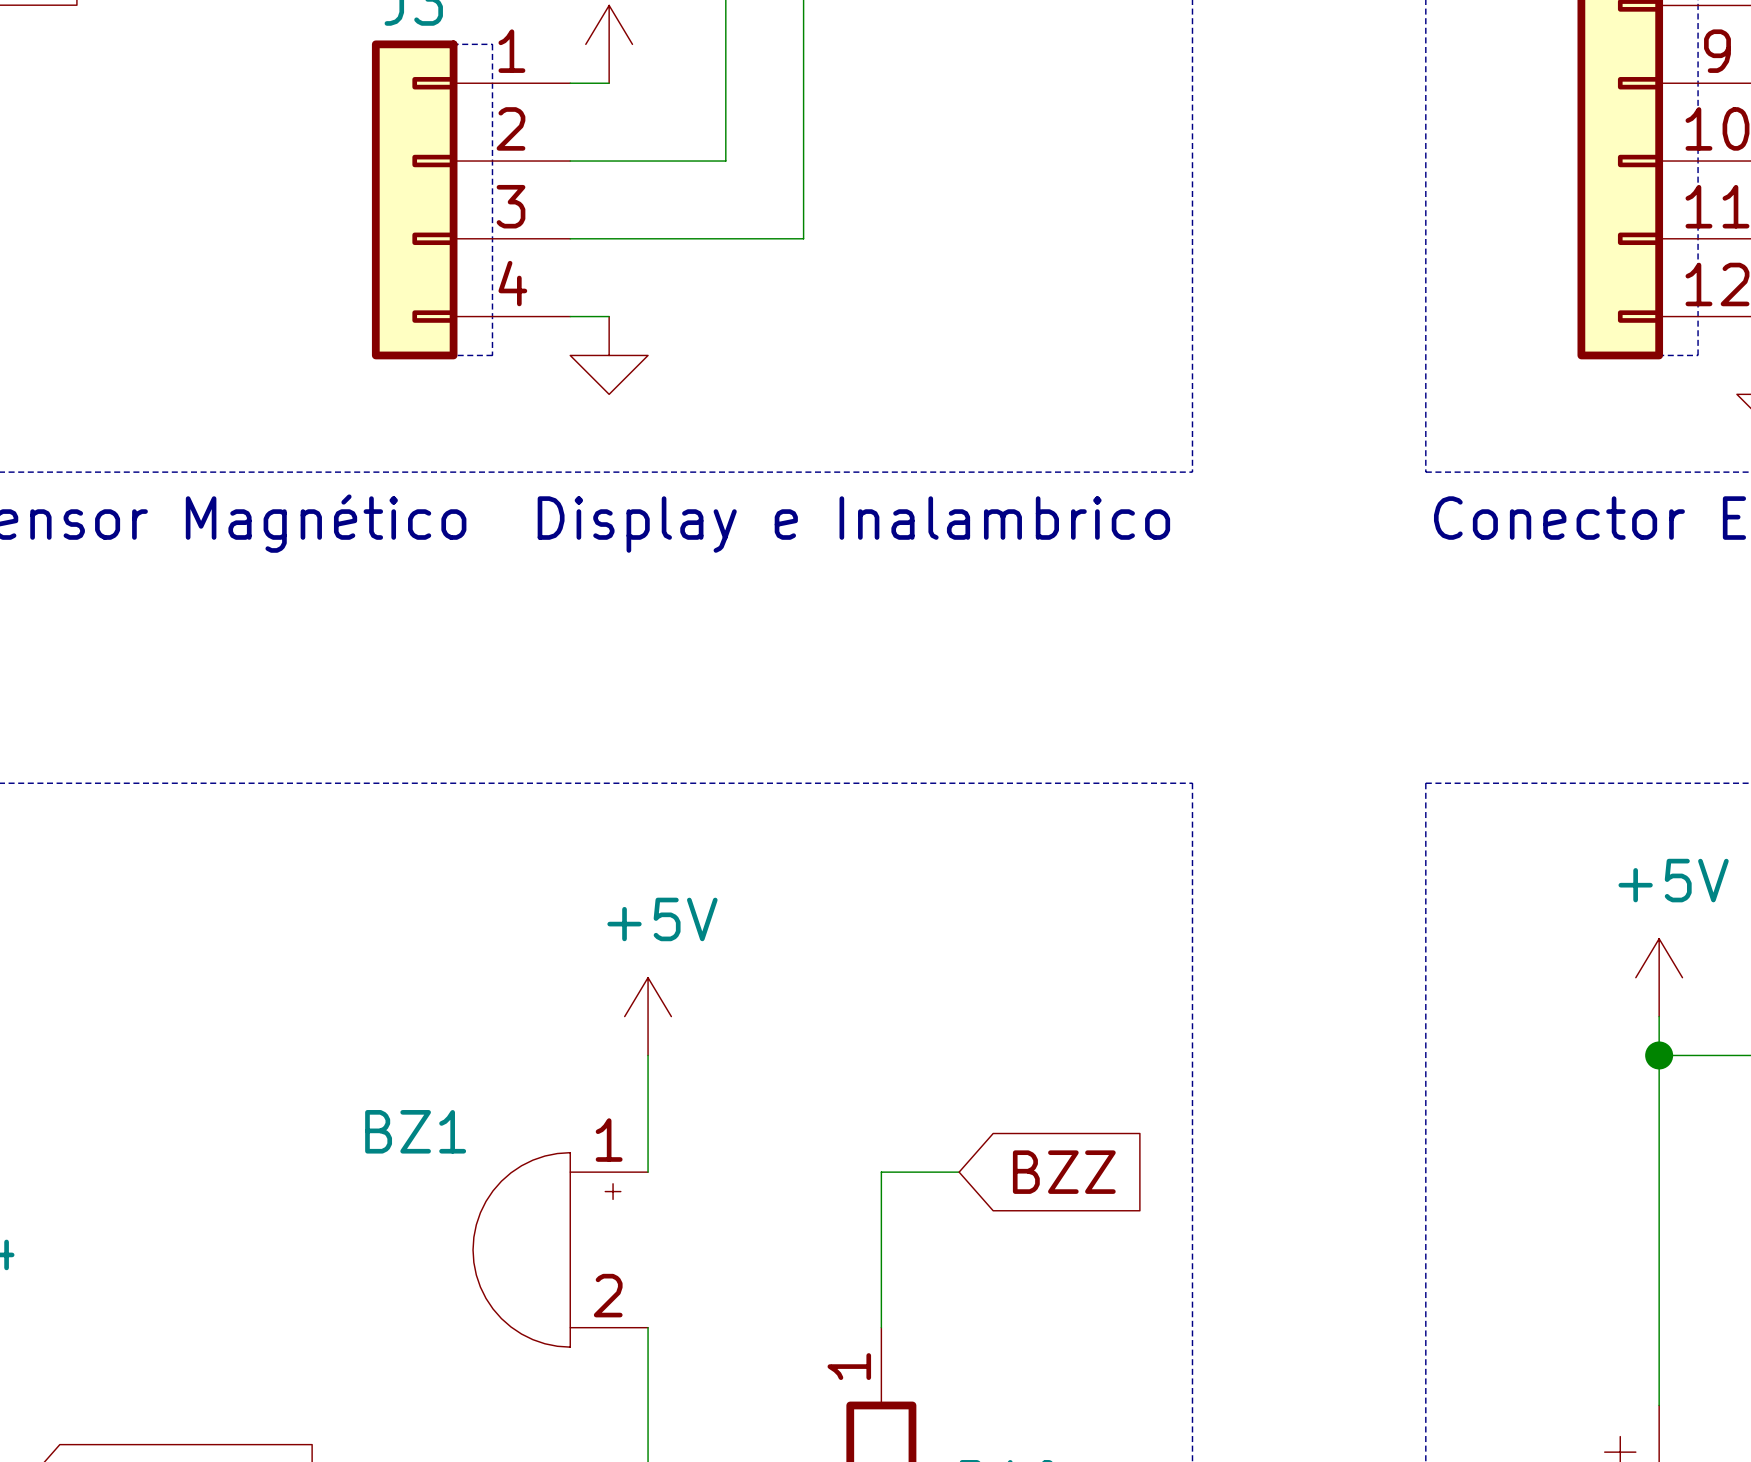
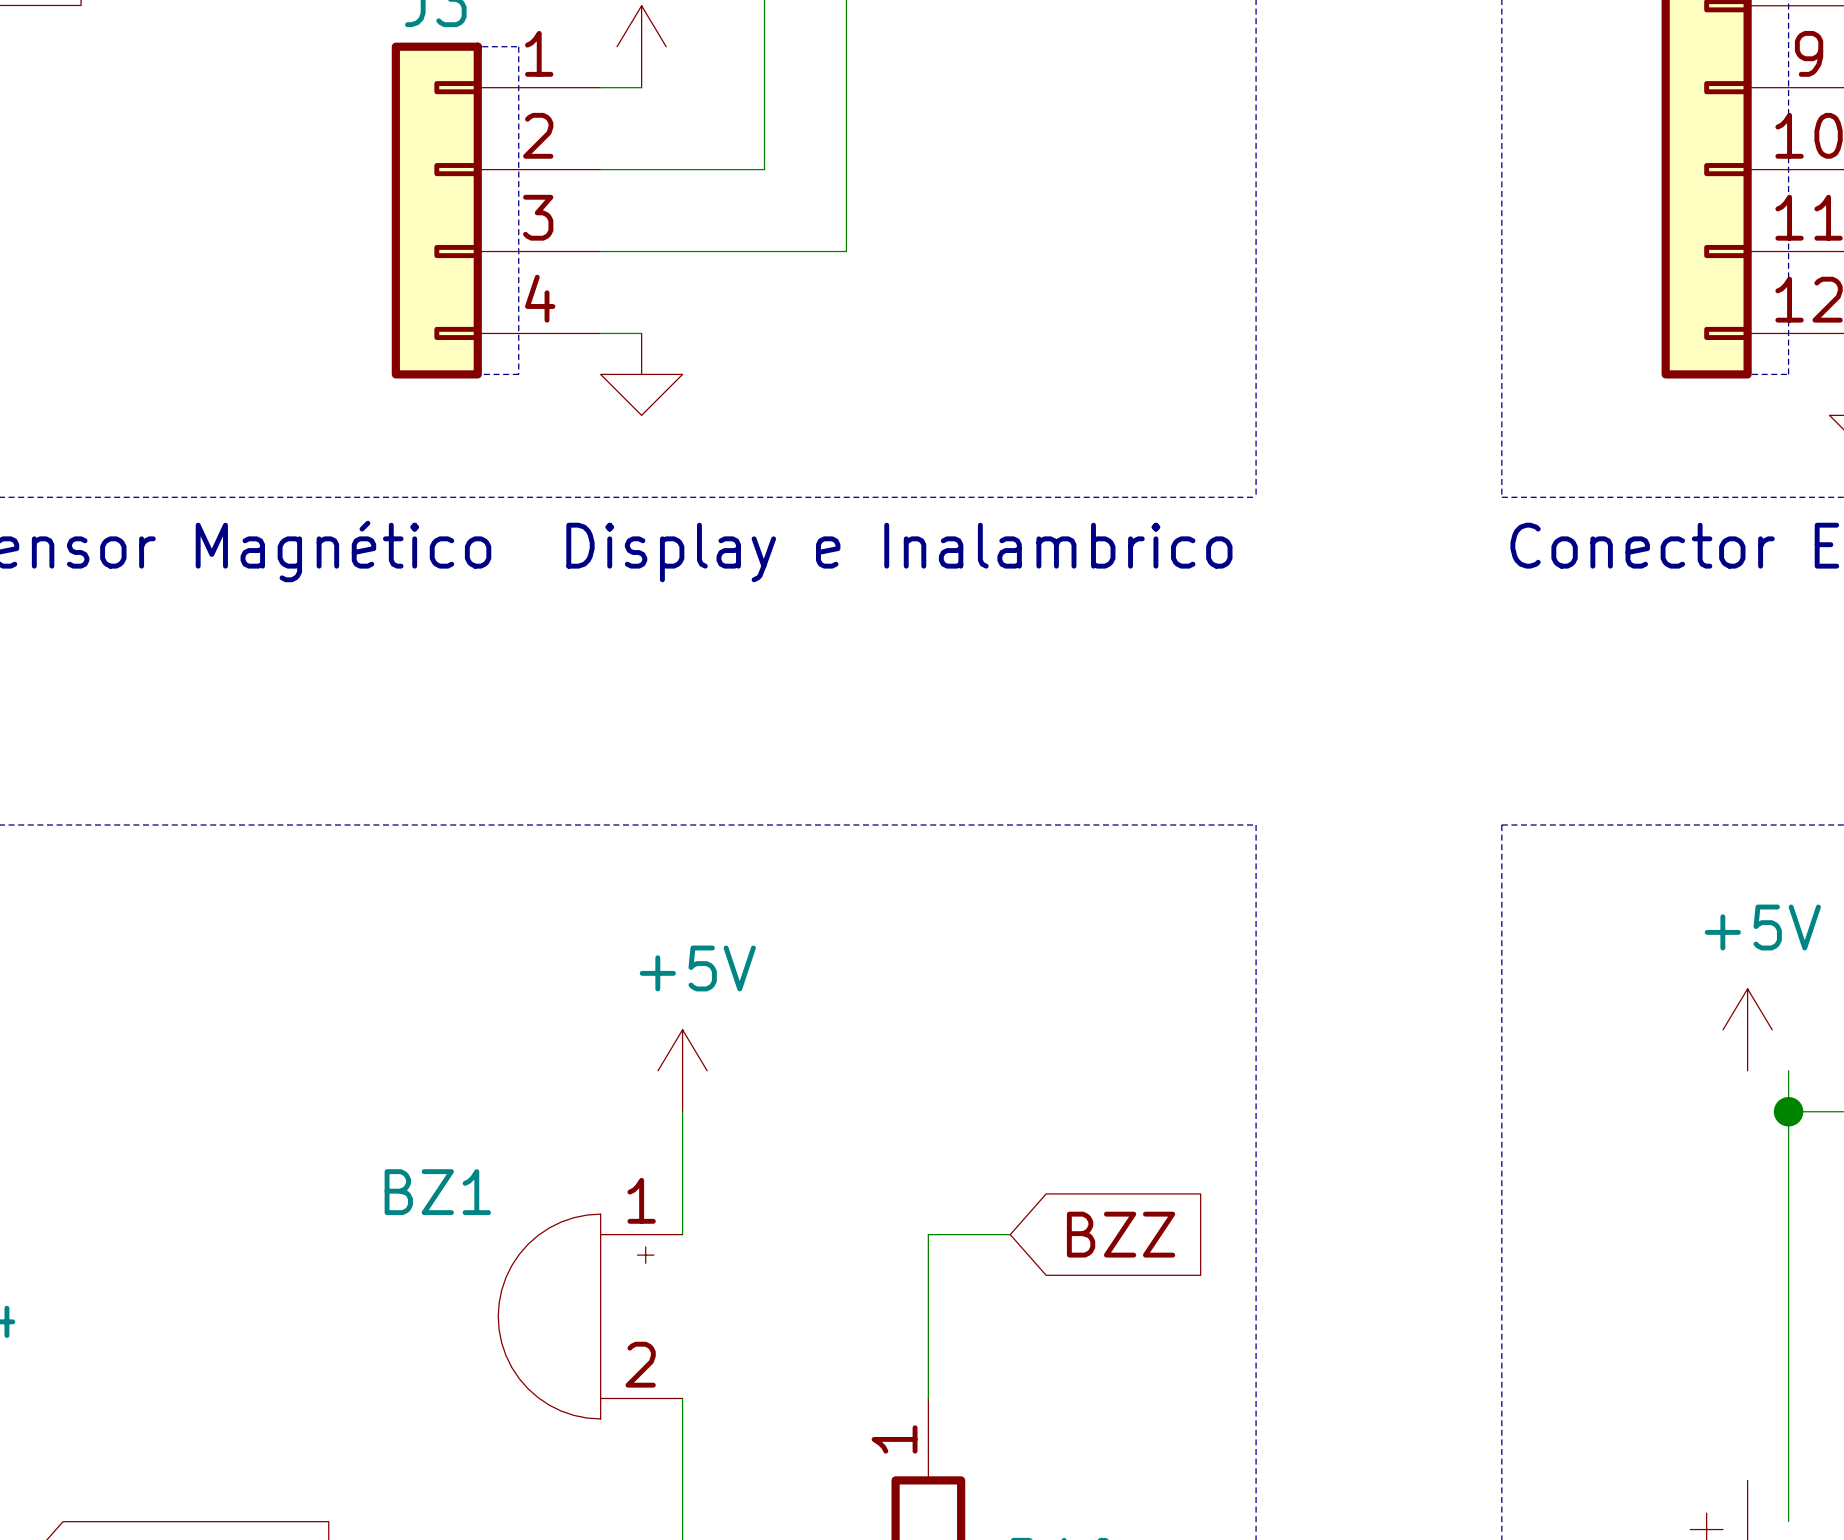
wire: (1659, 1016) (1659, 1405) -> none
wire: none -> (1788, 1070) (1788, 1521)
wire: (1659, 1055) (1698, 1055) -> none
junction position: (1659, 1055) -> (1788, 1111)

